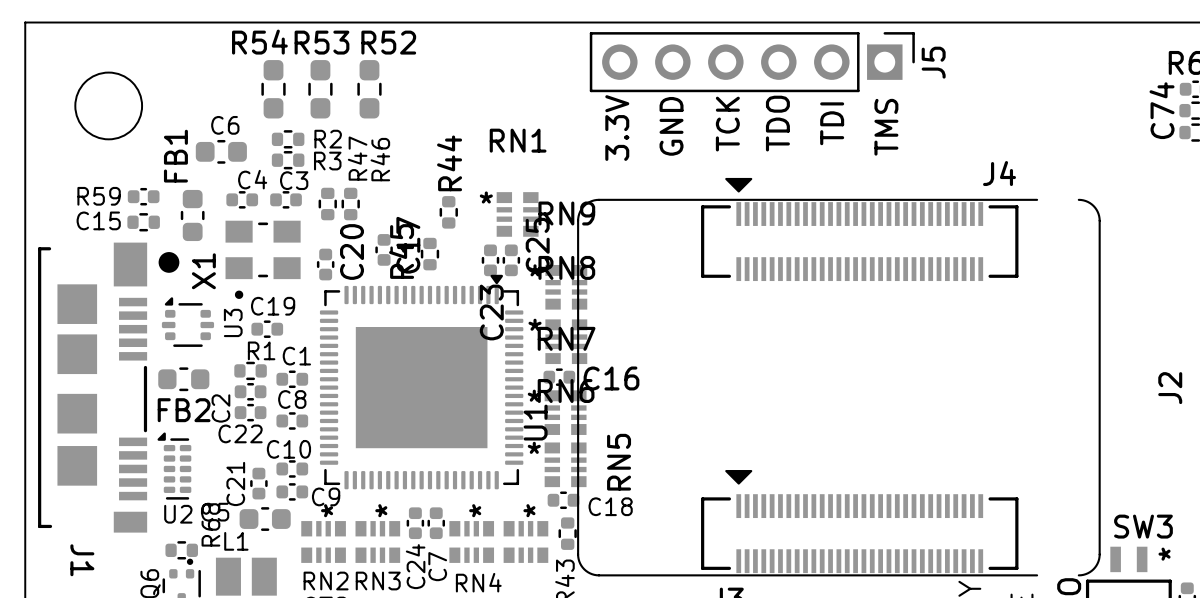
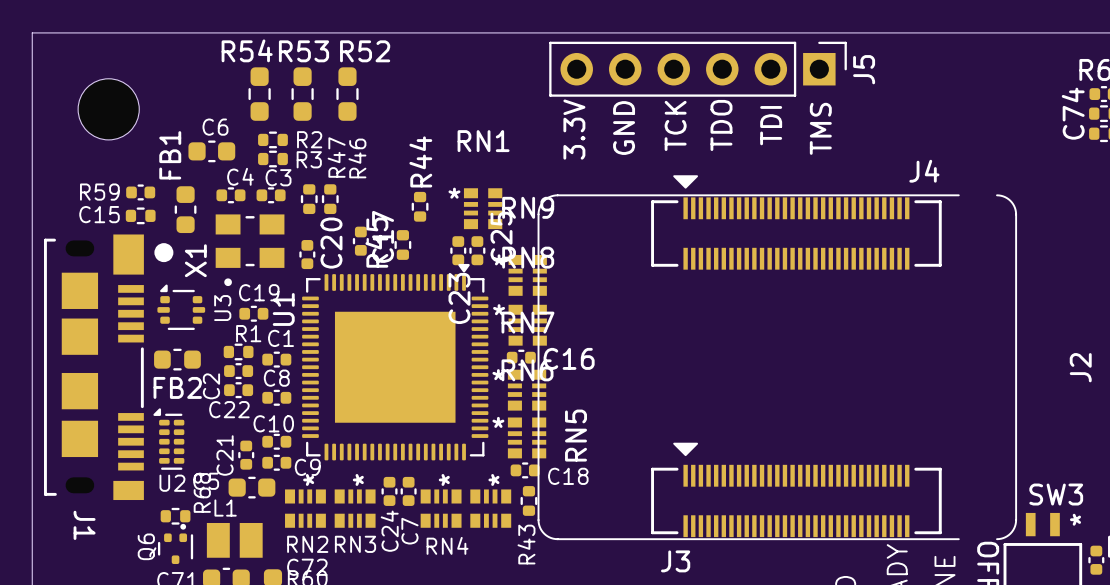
U1 name position: U1 (535, 422) -> U1 (283, 309)

